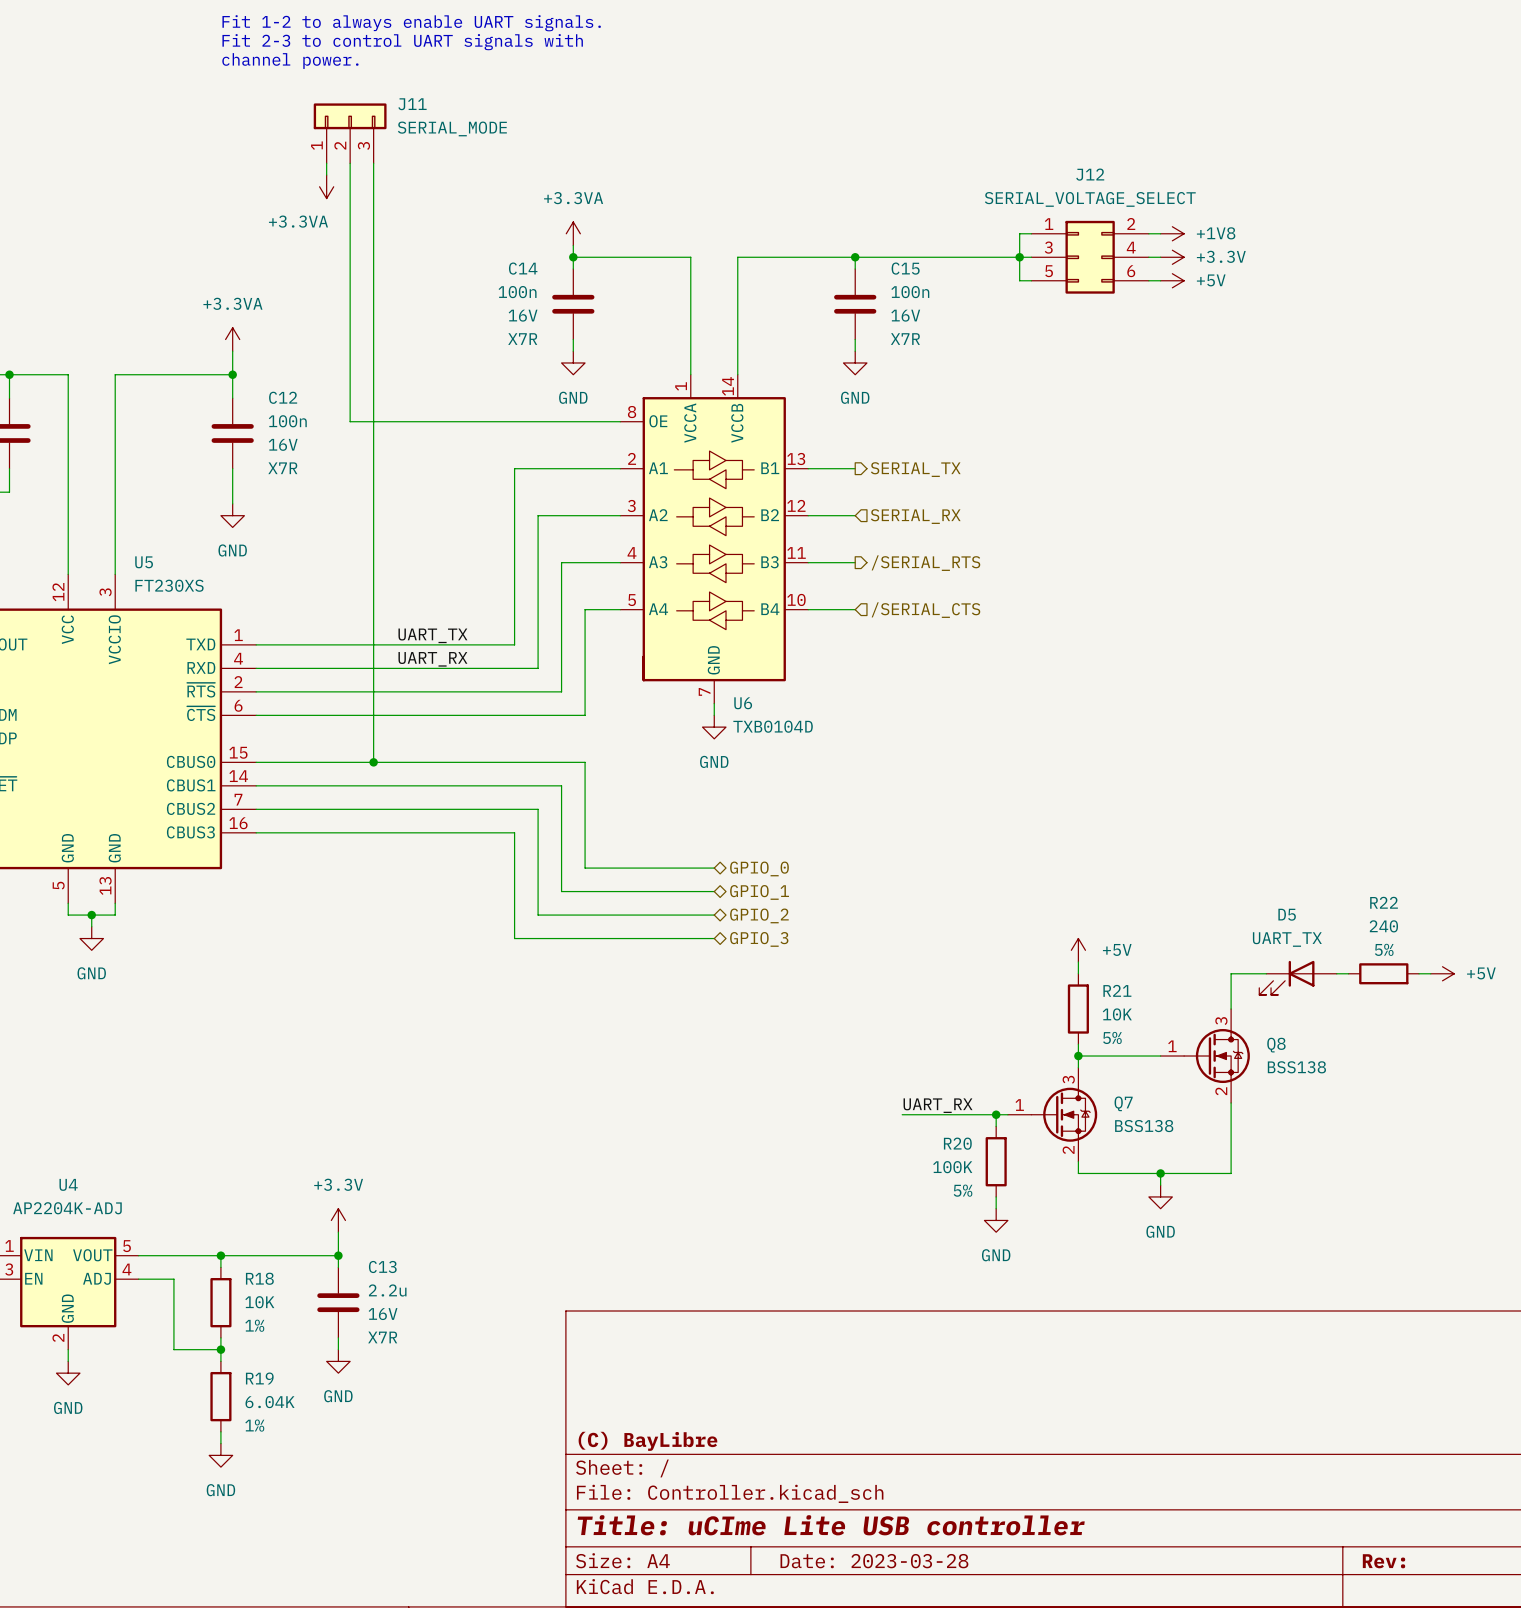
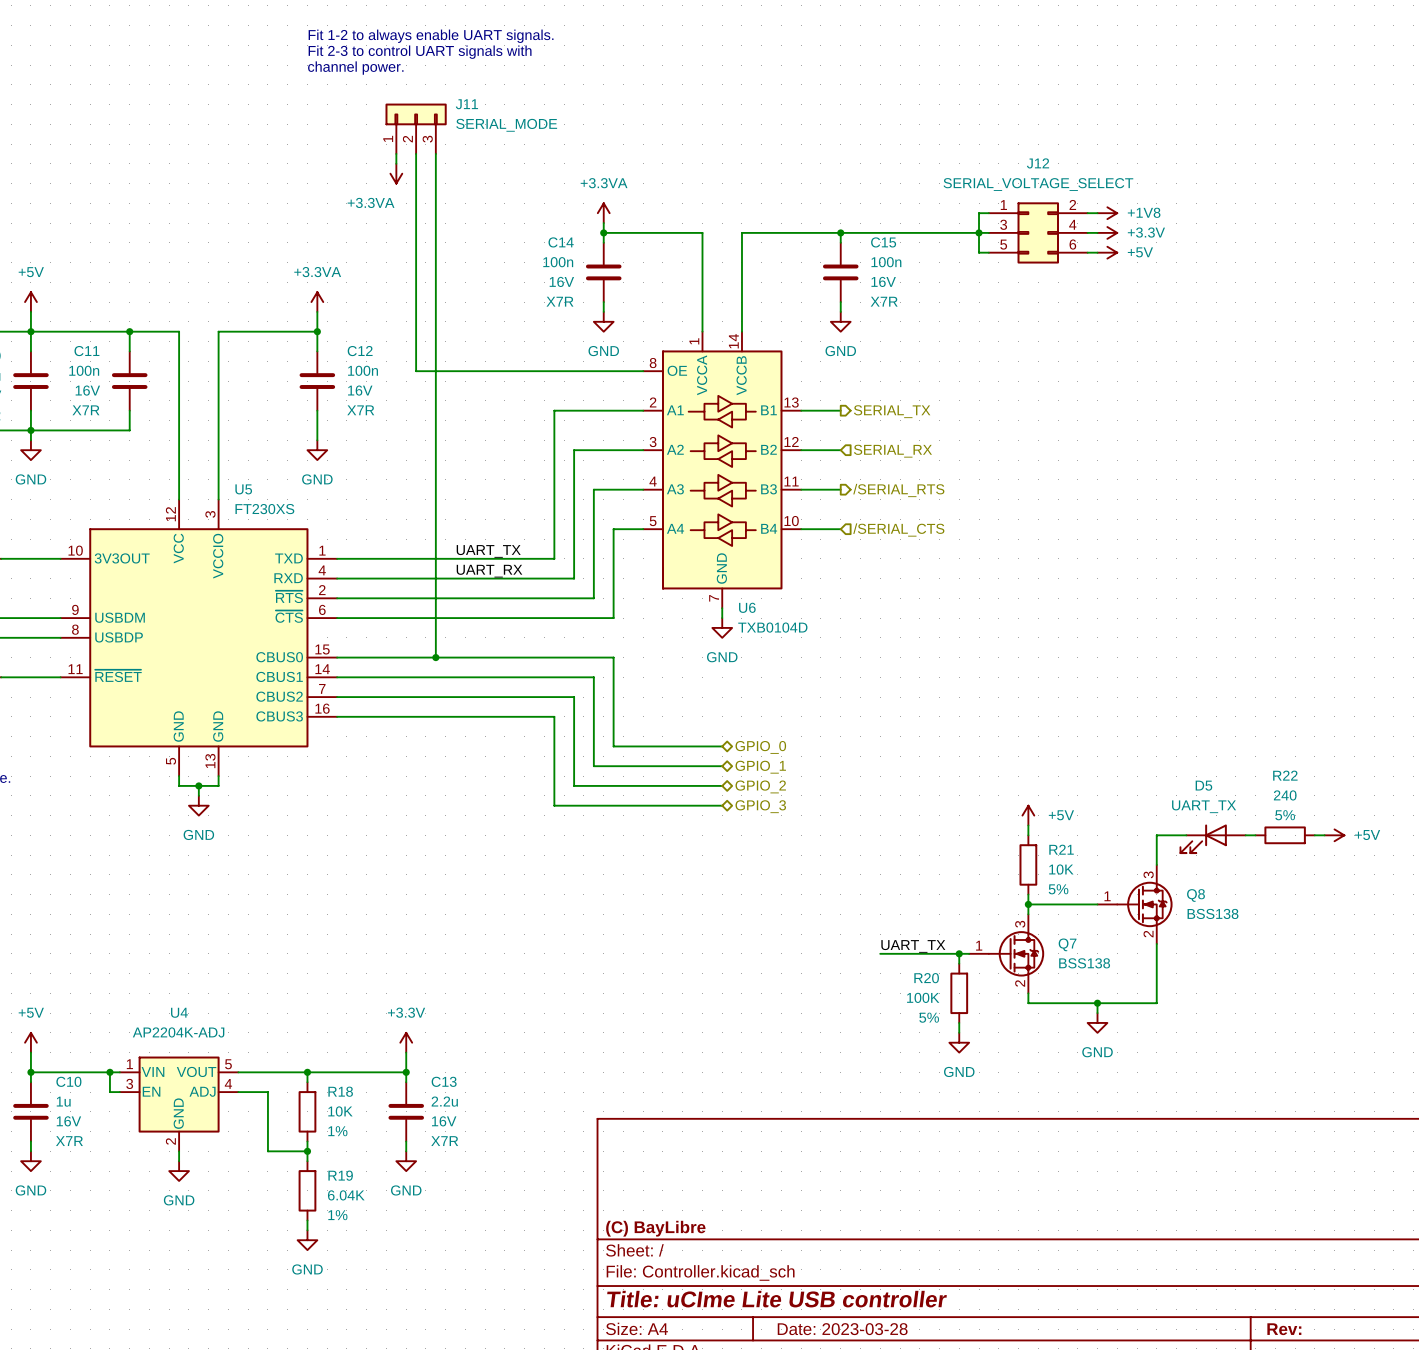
label: UART_RX (938, 1105) -> UART_TX (913, 946)

